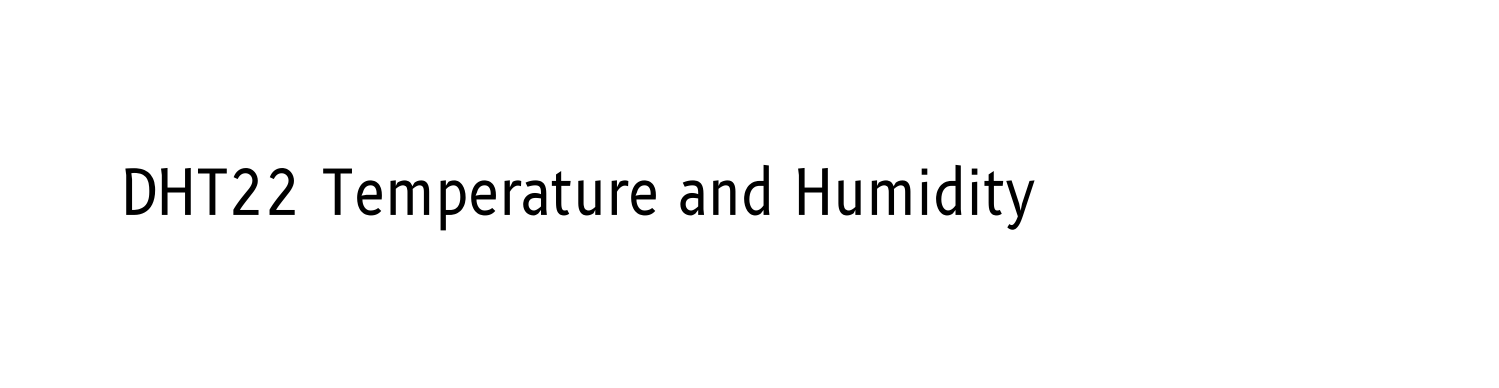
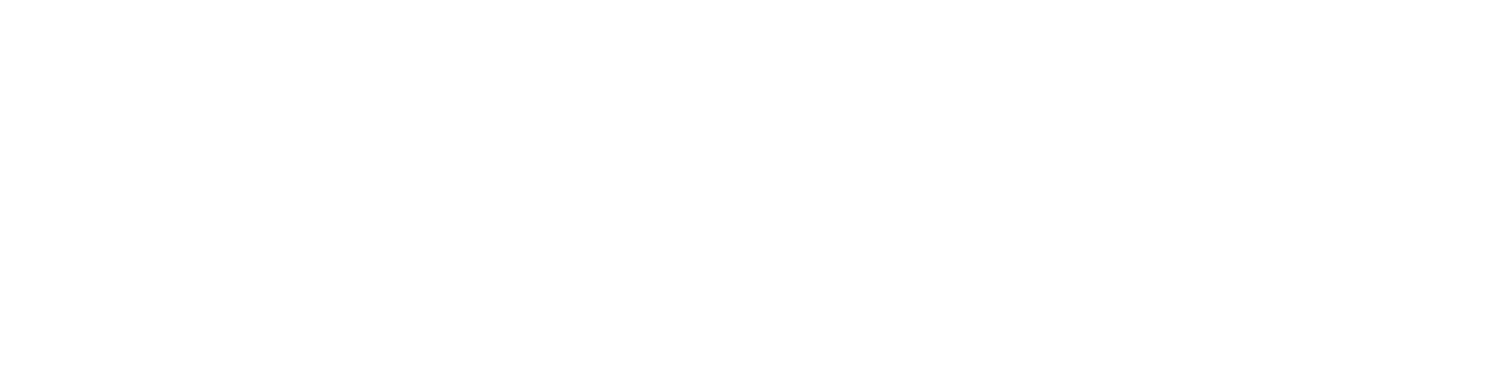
text: DHT22 Temperature and Humidity (579, 197) -> none

